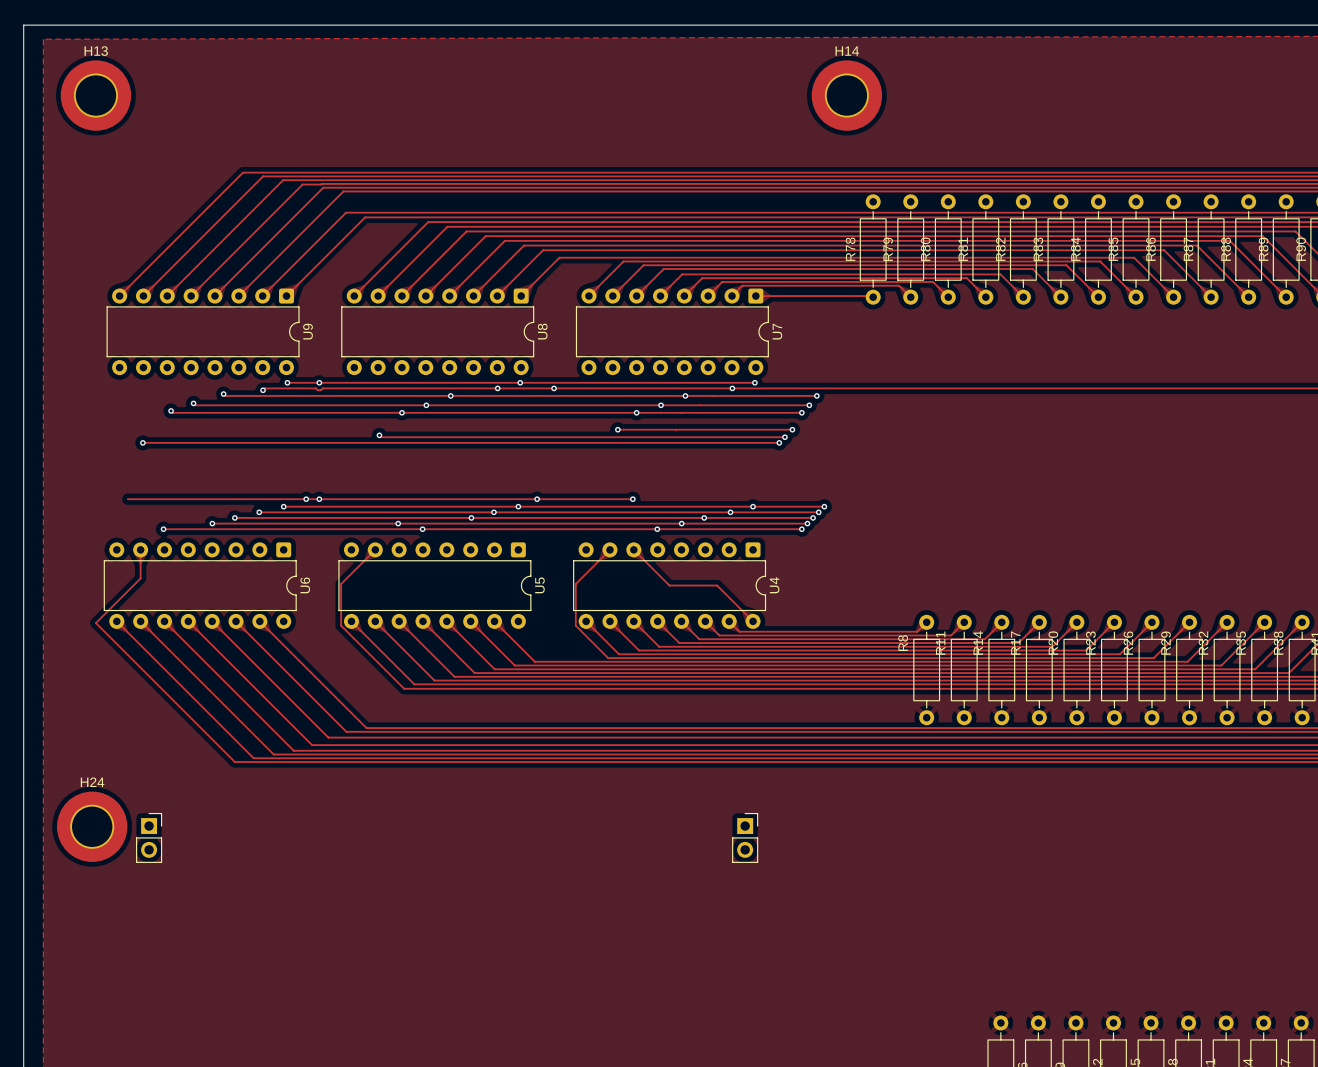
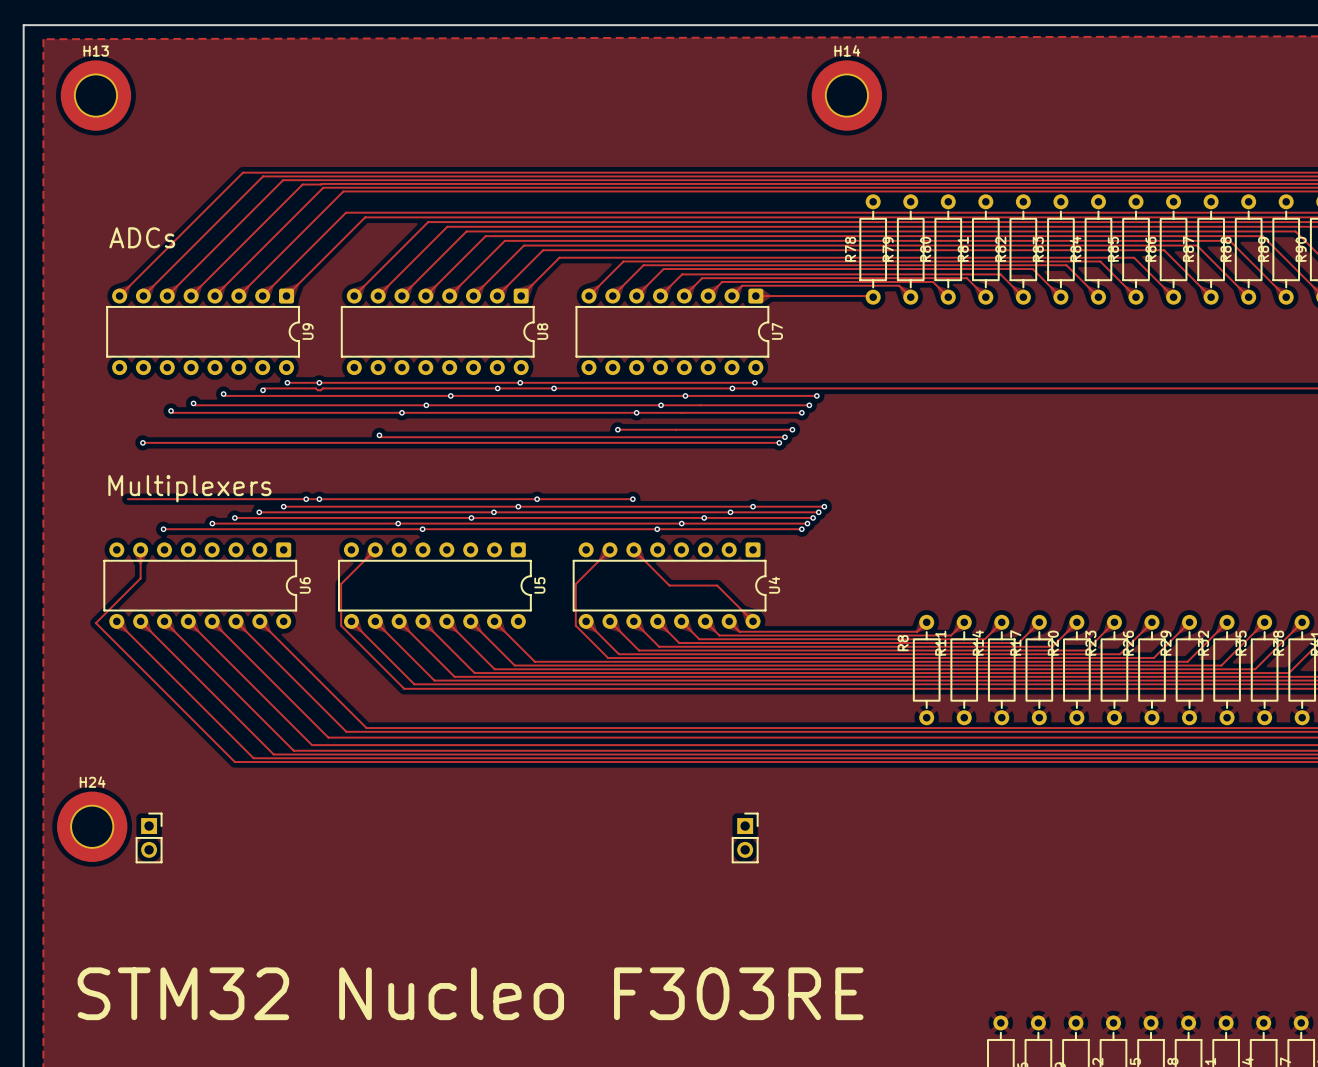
text: none -> ADCs (142, 237)
text: none -> Multiplexers (189, 488)
text: none -> STM32 Nucleo F303RE (470, 993)

